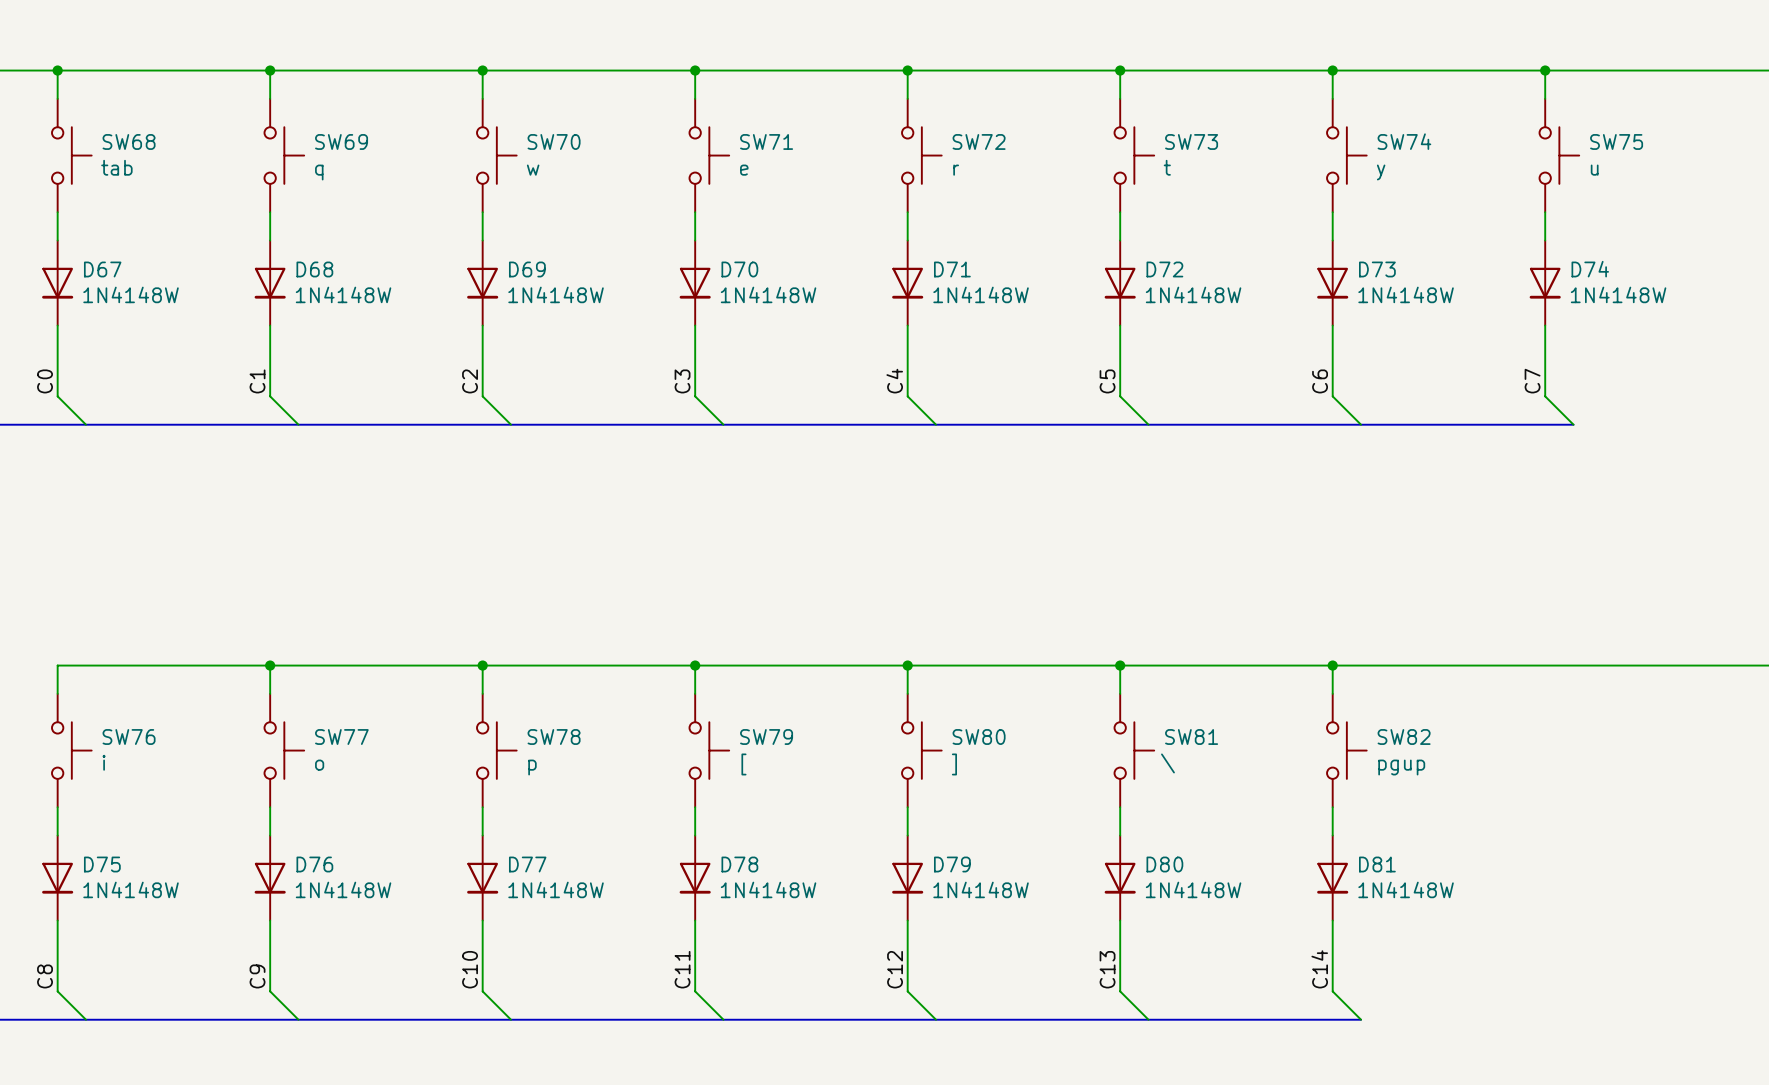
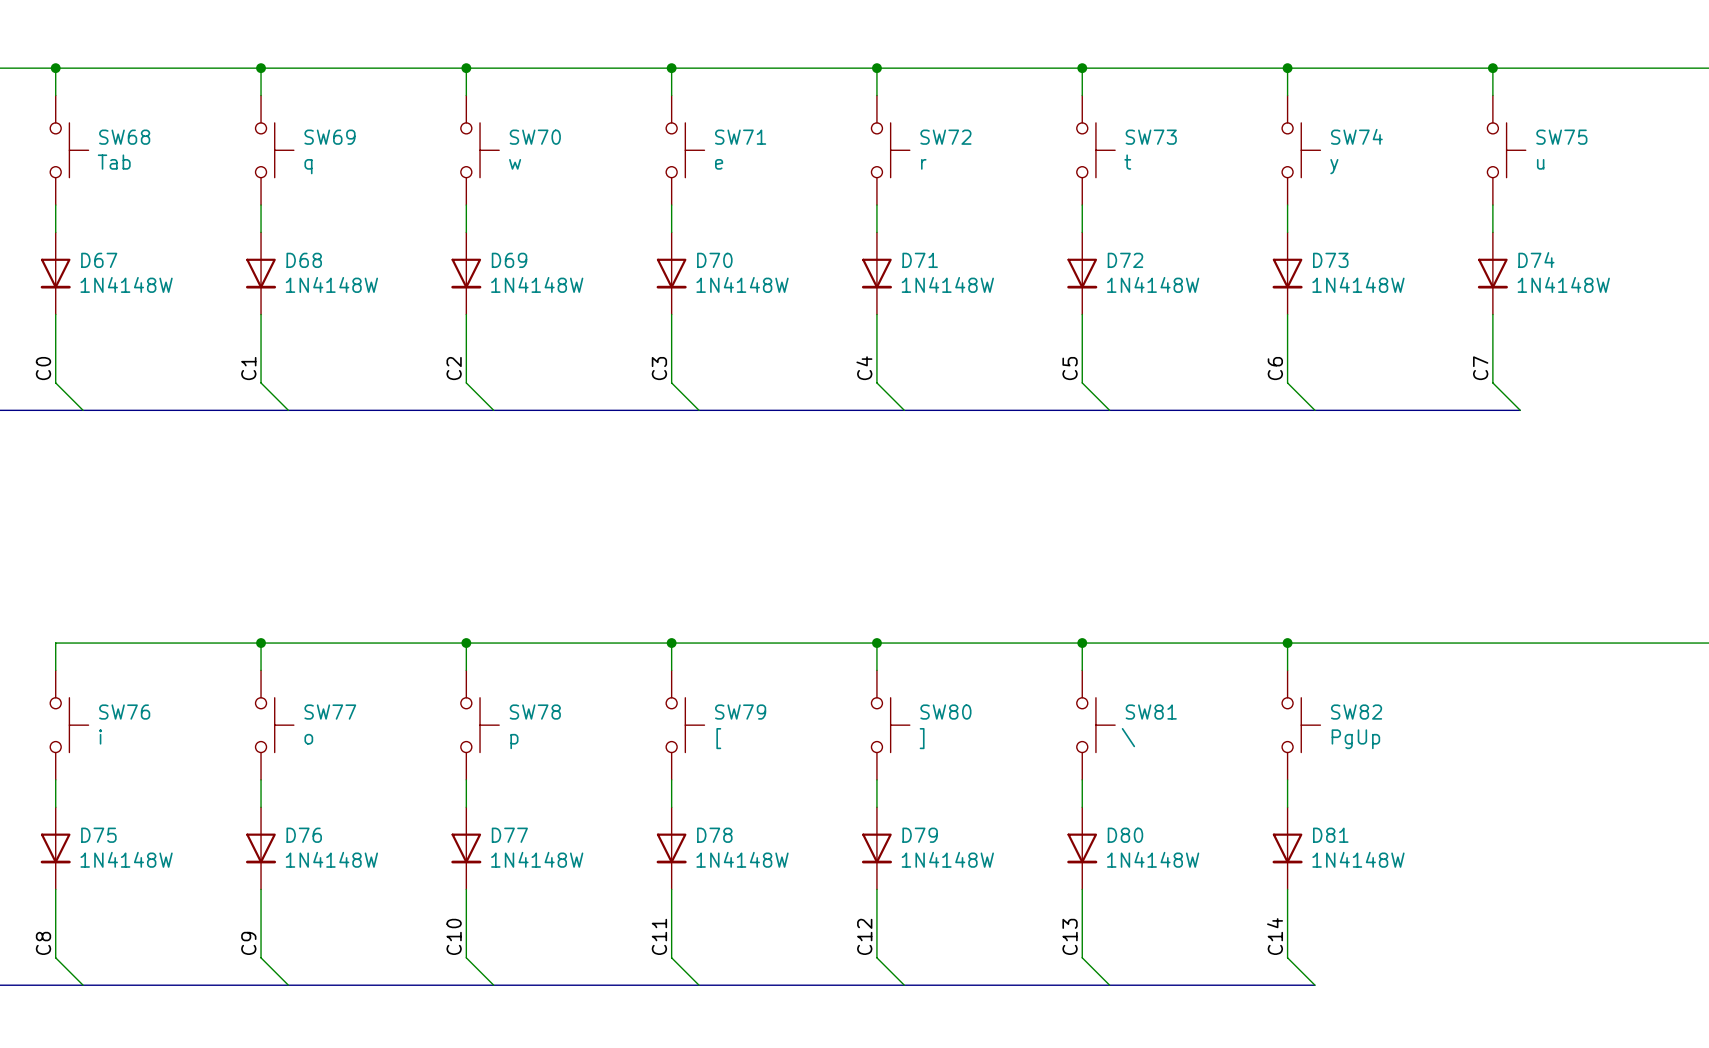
SW68 value: tab (116, 167) -> Tab (114, 162)
SW82 value: pgup (1401, 767) -> PgUp (1355, 739)

